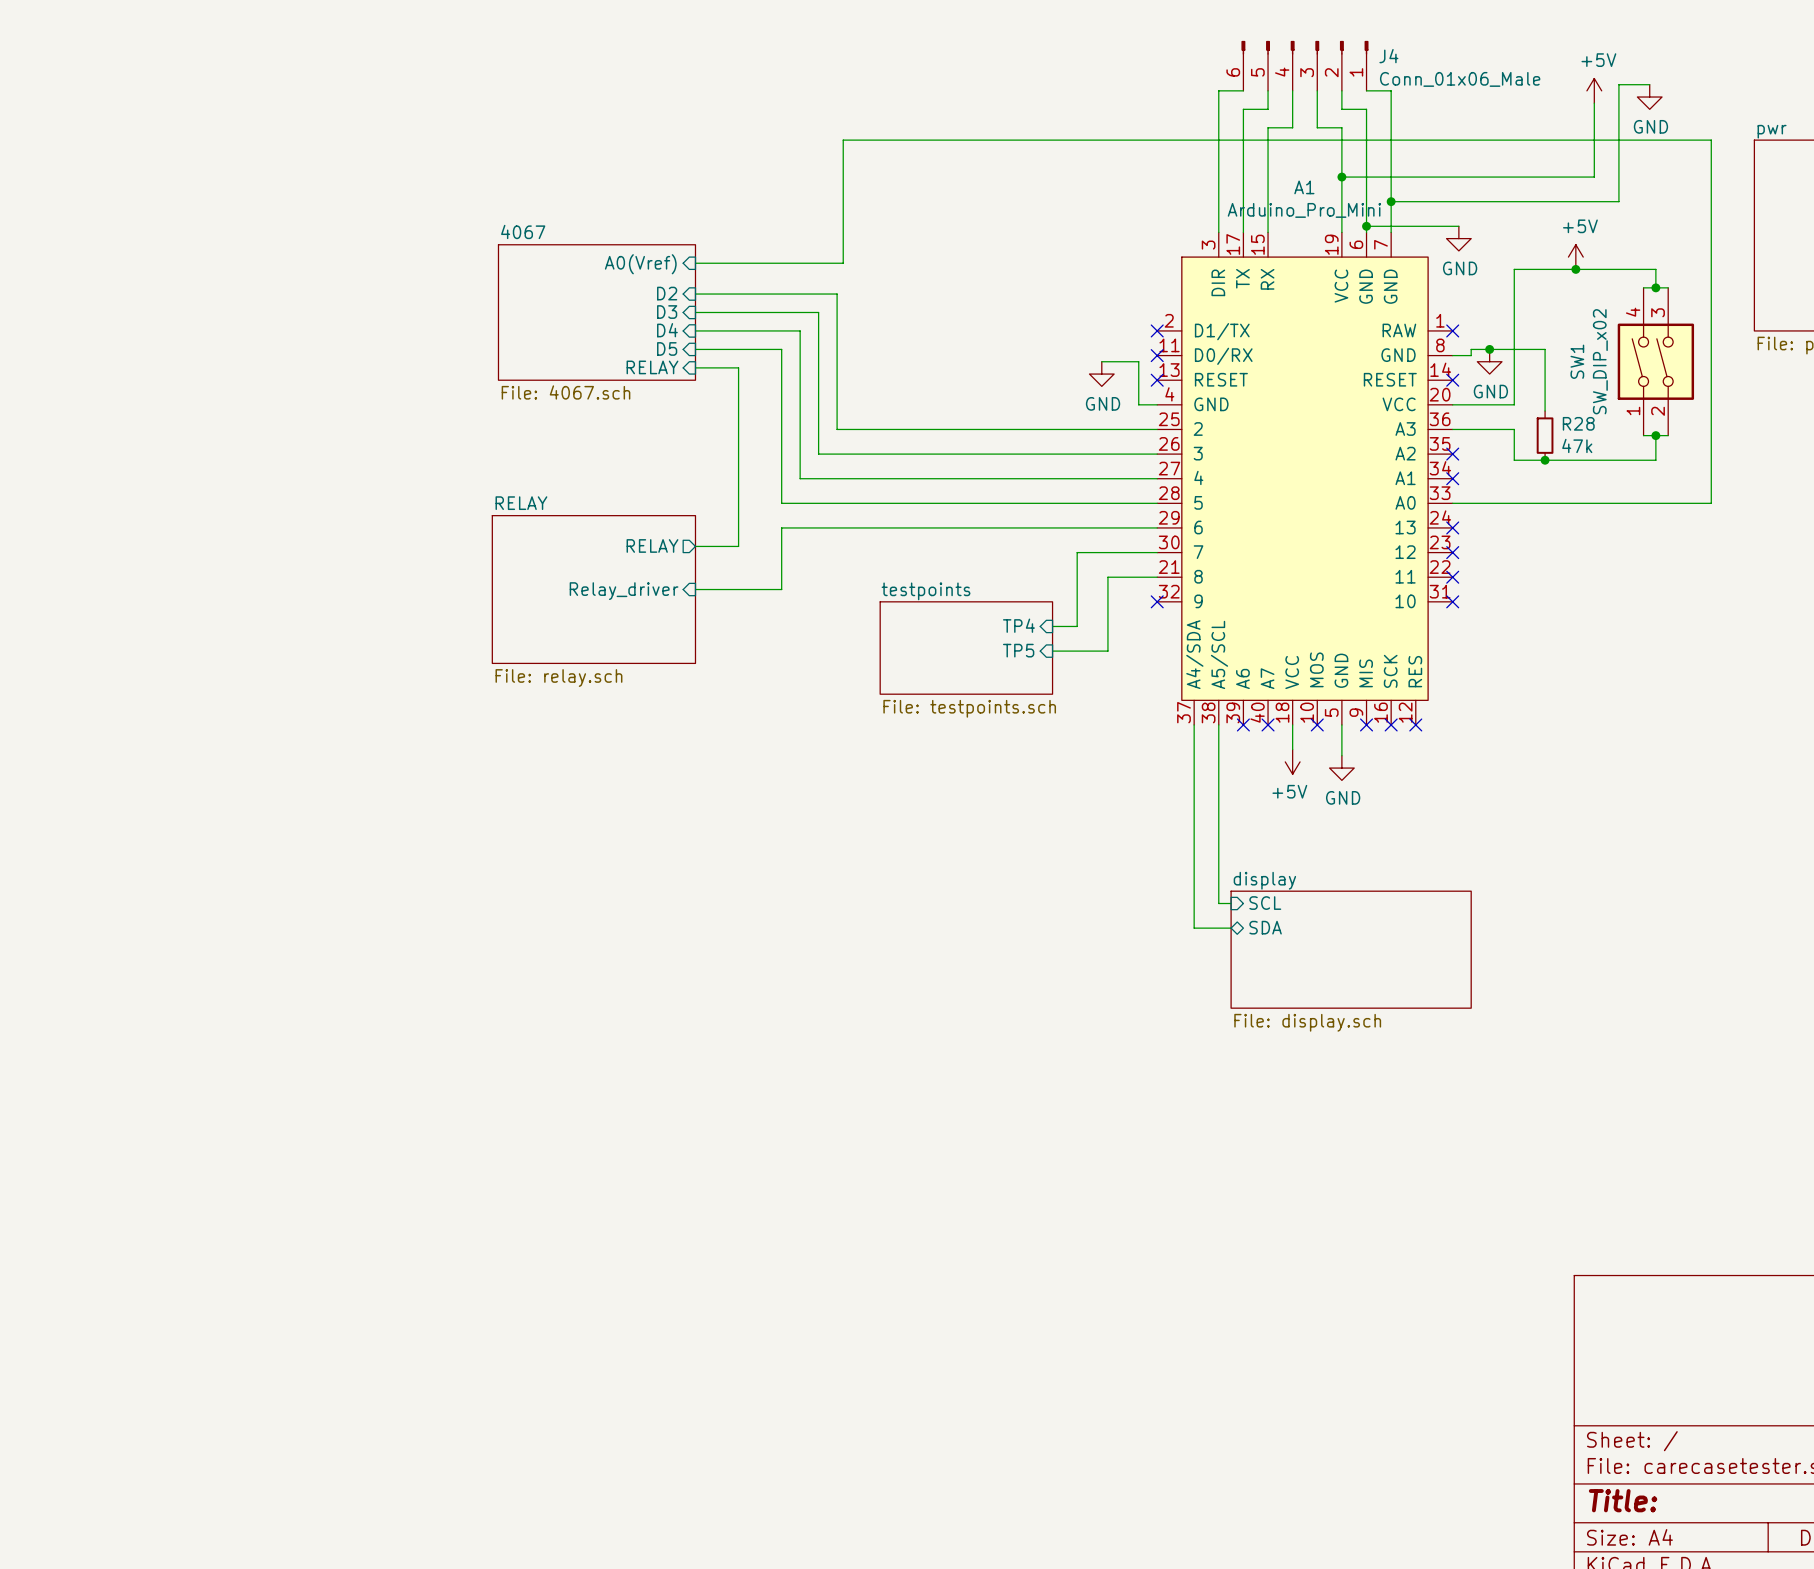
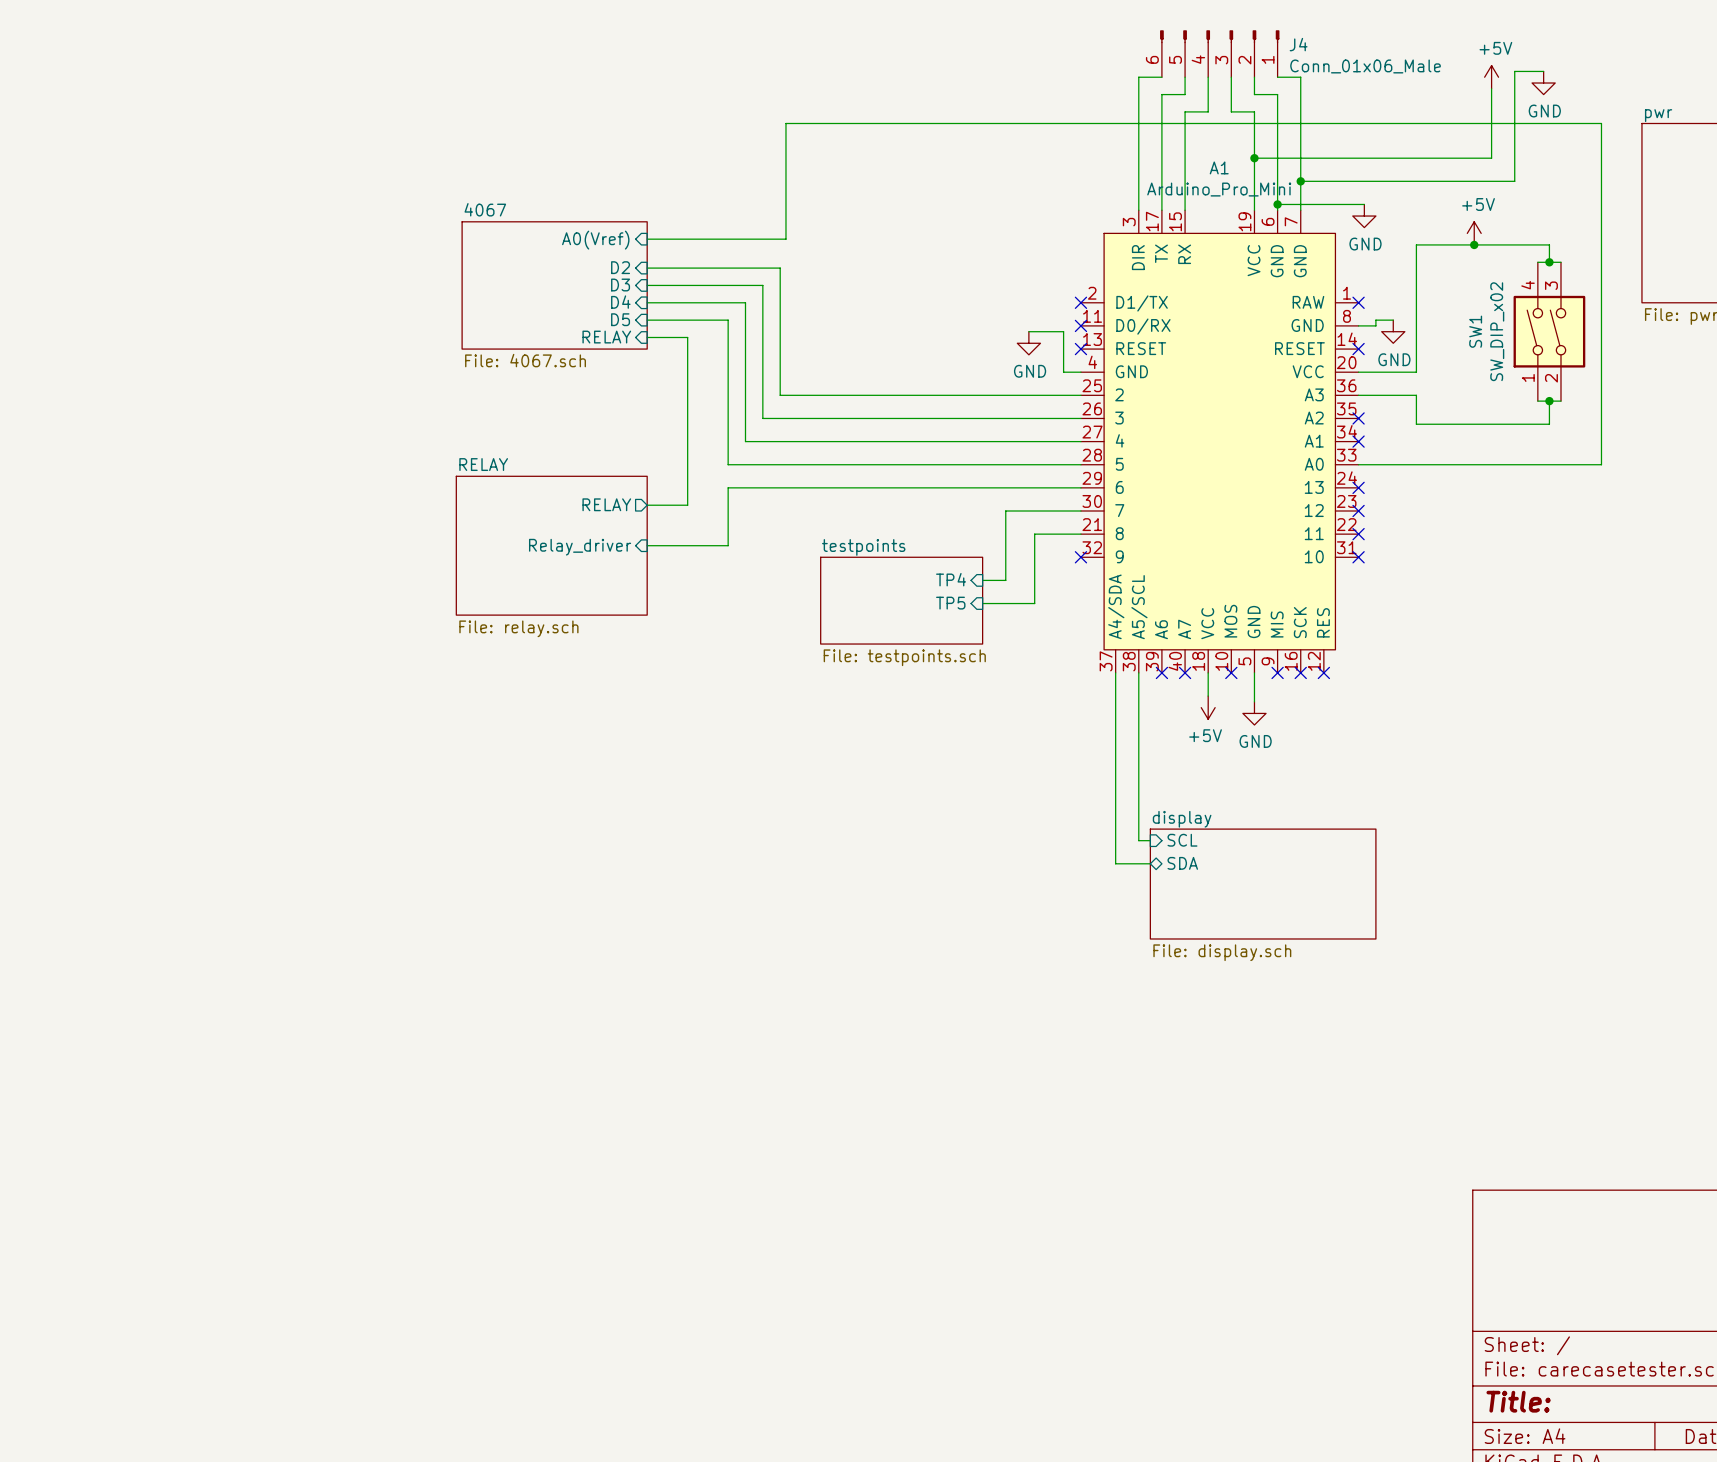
wire: (1489, 349) (1545, 349) (1545, 410) -> none
junction: (1489, 349) -> none
R28: 47k (1545, 435) -> none
junction: (1545, 460) -> none

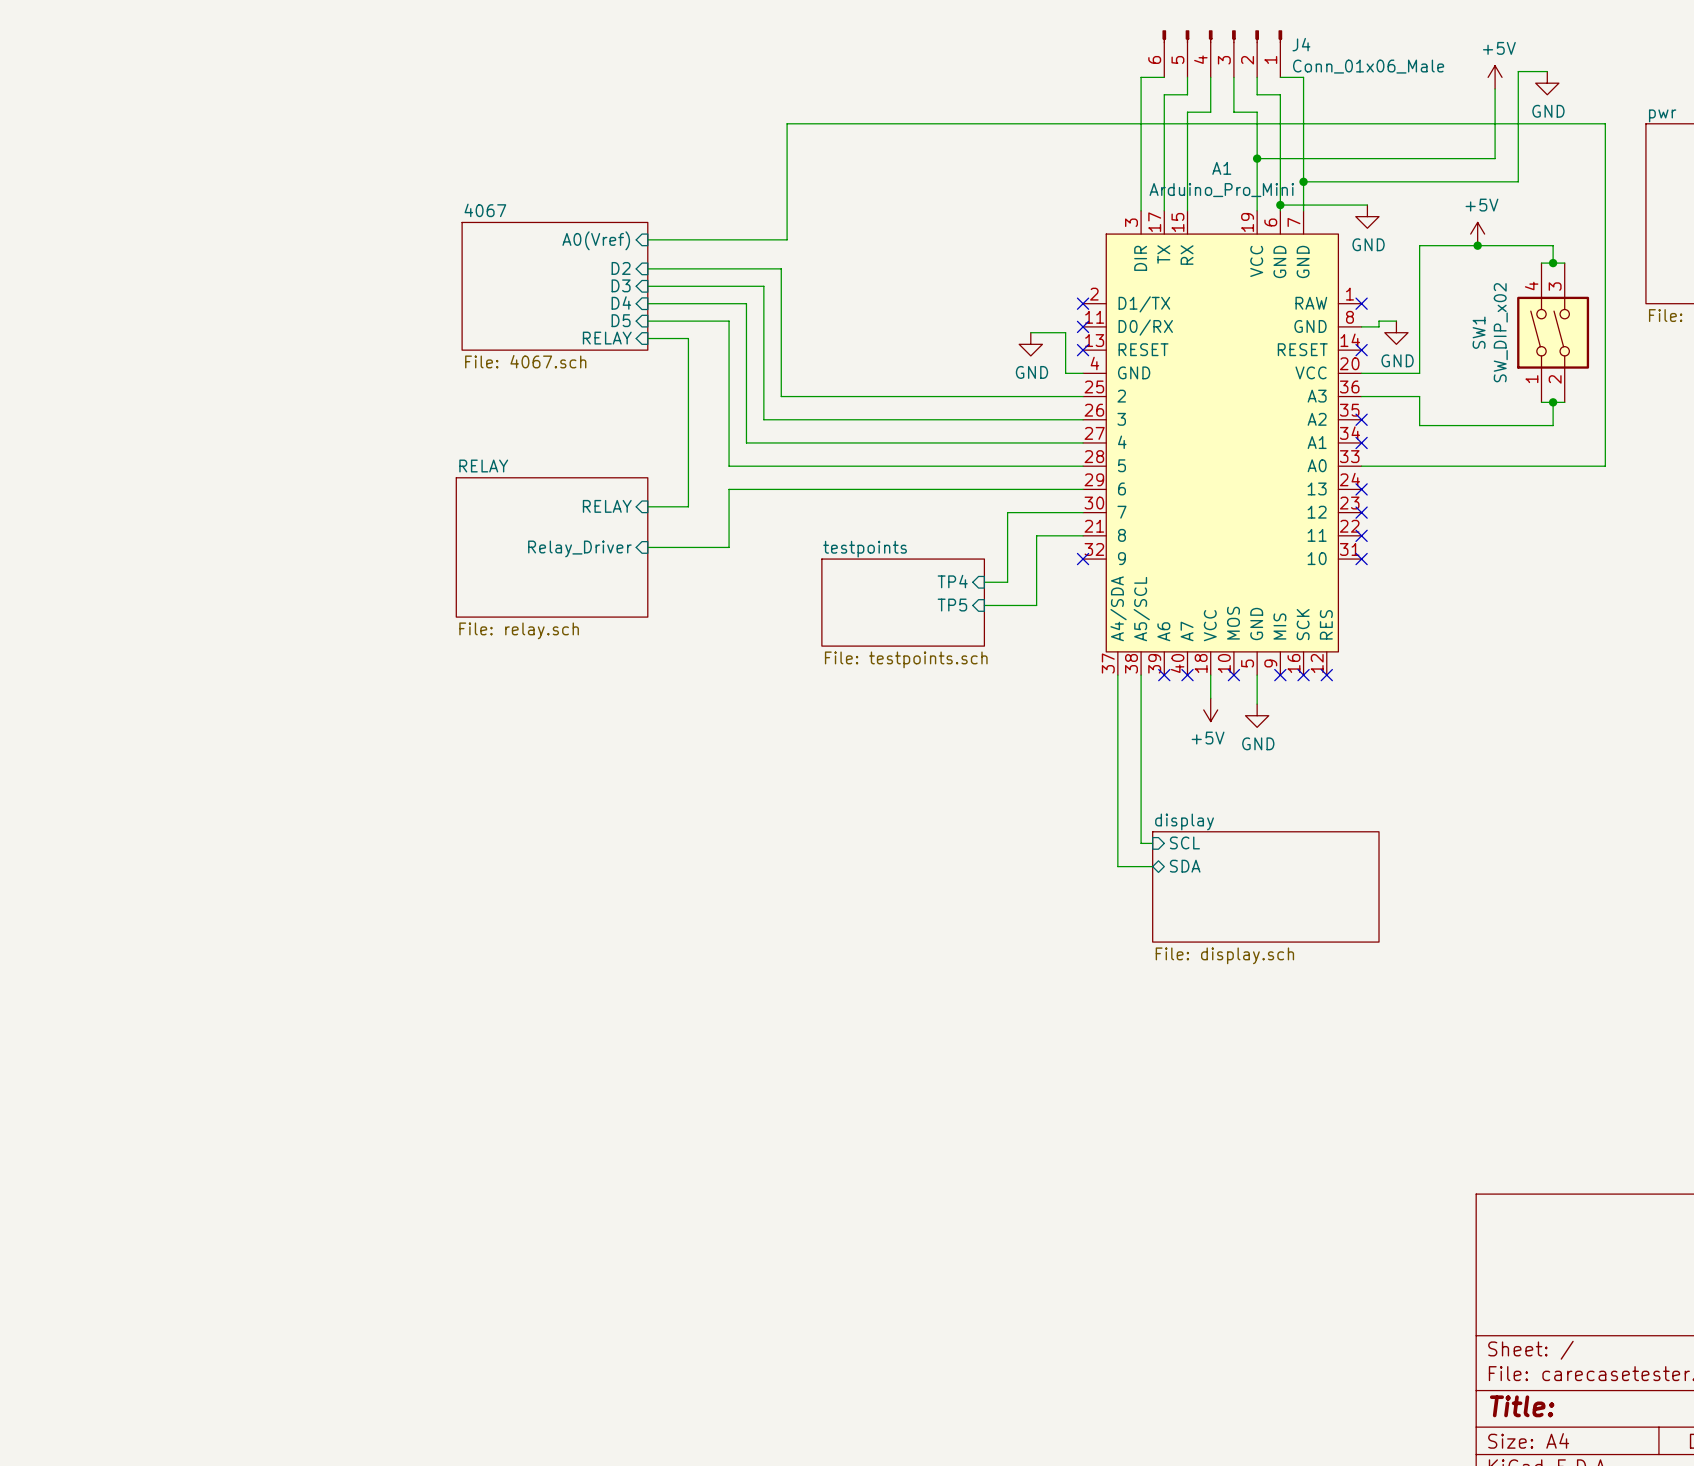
sheet pin shape: output (606, 504) -> input (607, 506)
sheet pin: Relay_driver (580, 547) -> Relay_Driver (579, 548)

